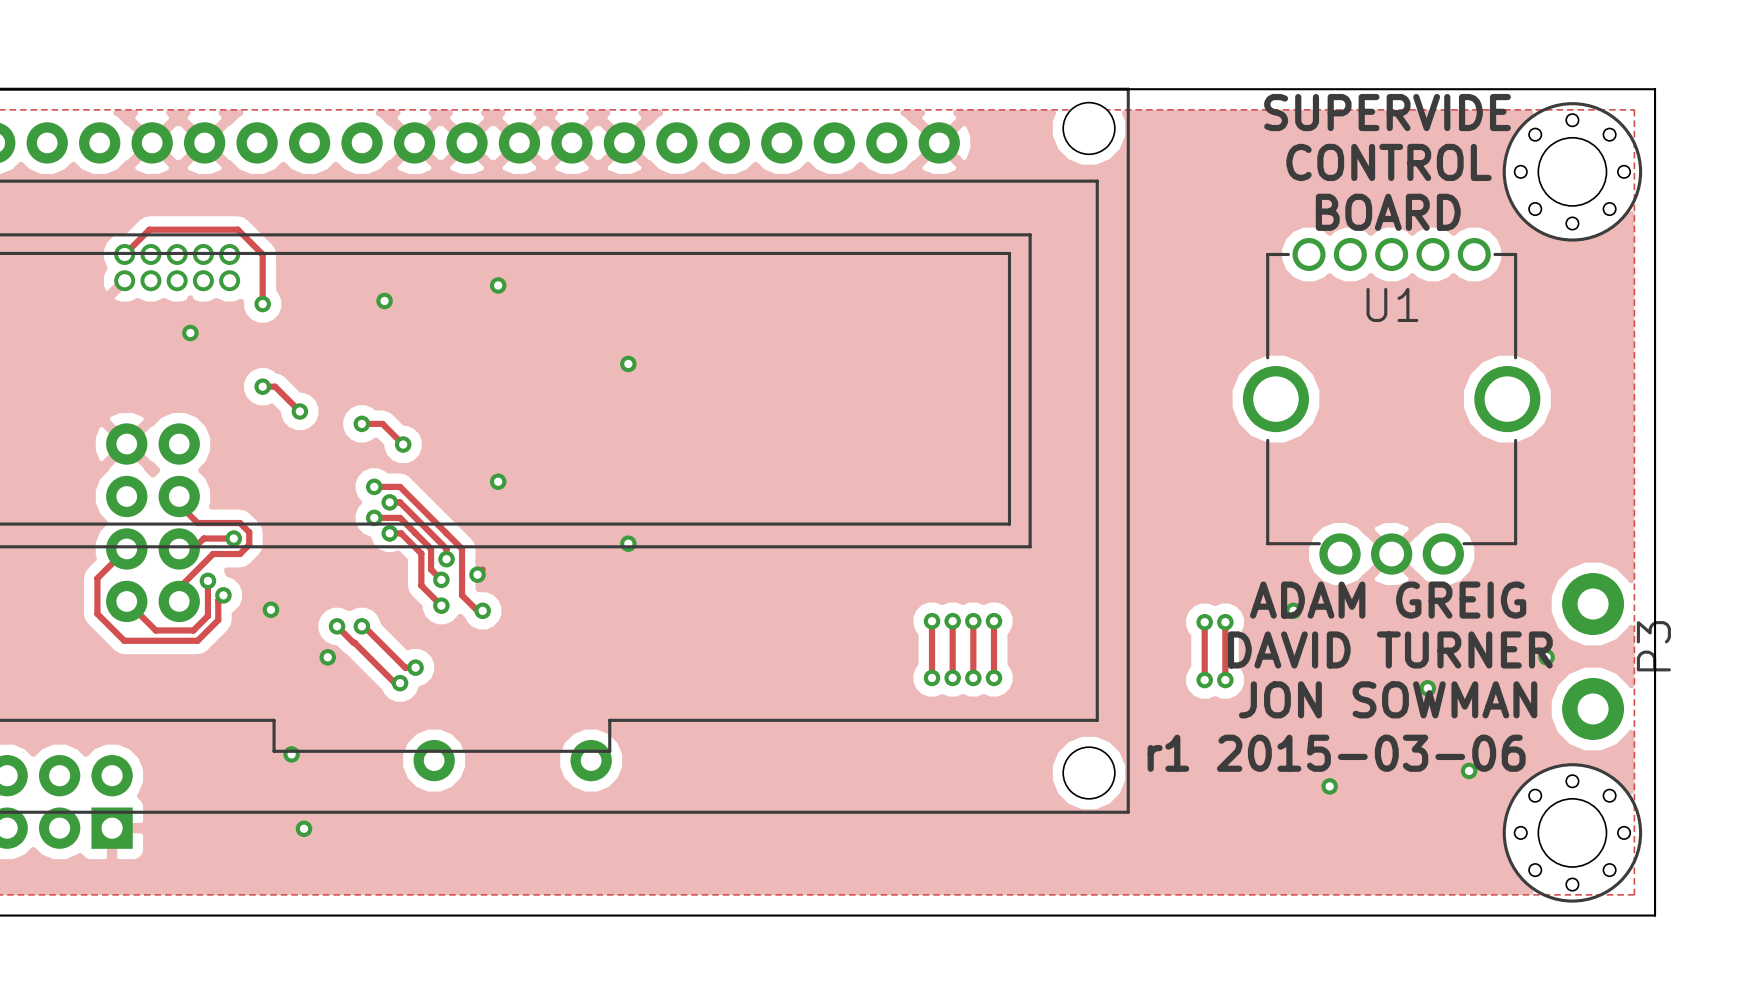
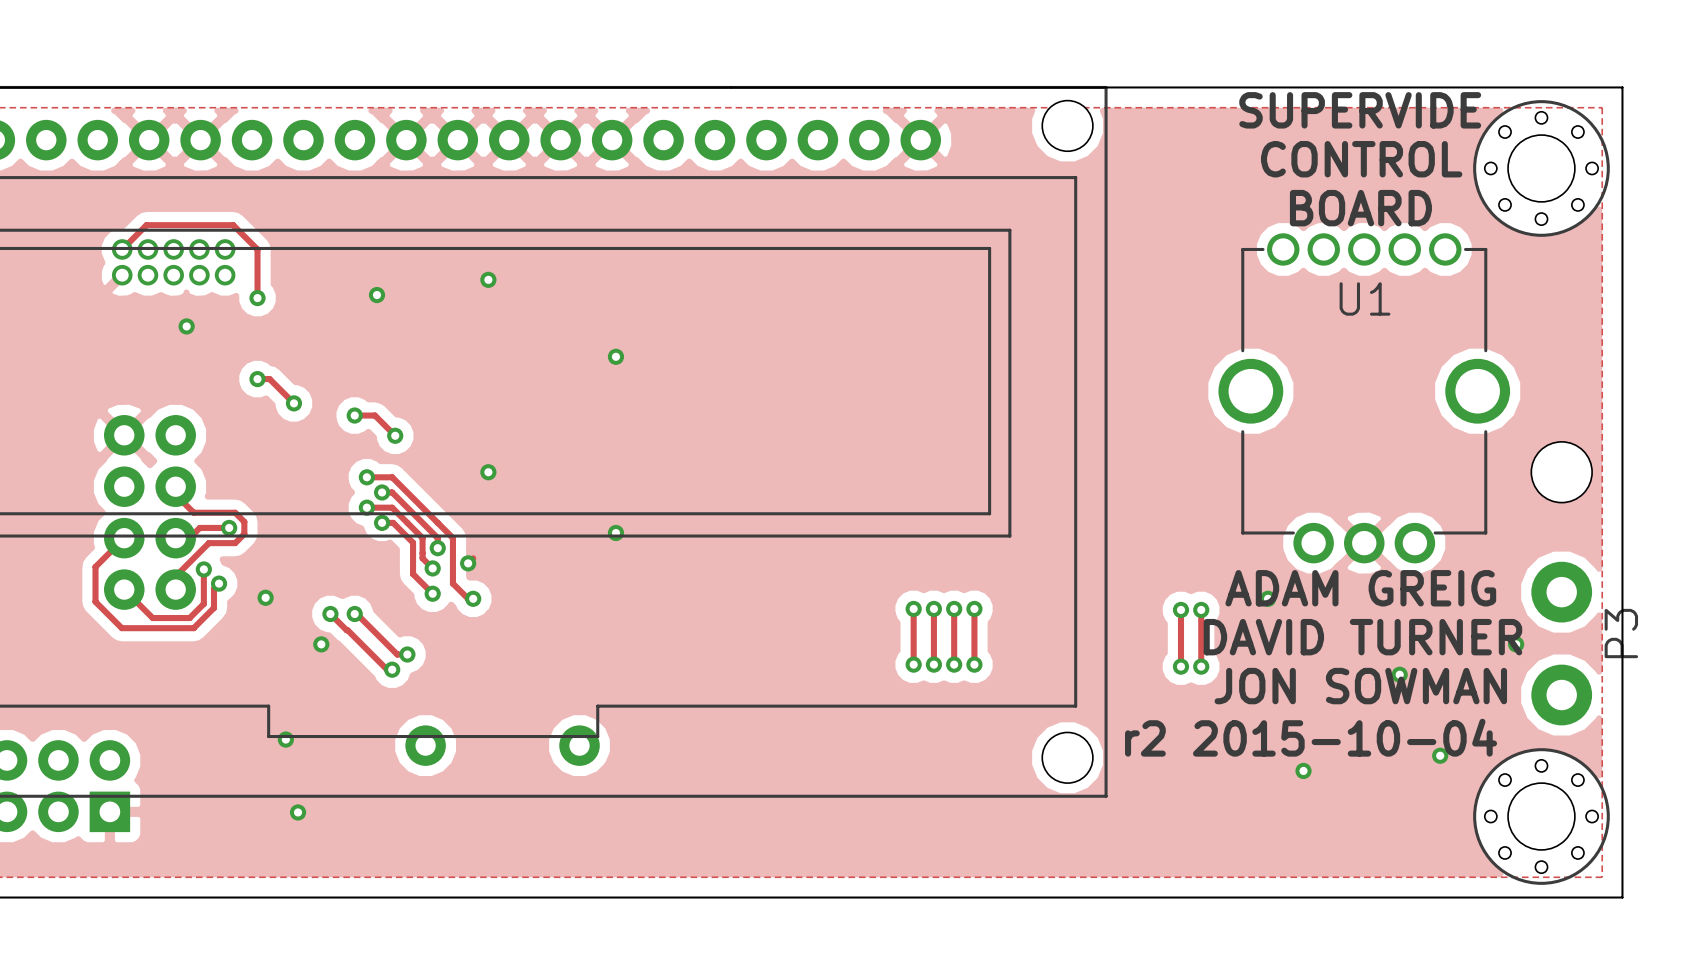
part: none -> (1561, 472)
text: r1 2015-03-06 (1336, 753) -> r2 2015-10-04 (1311, 737)

